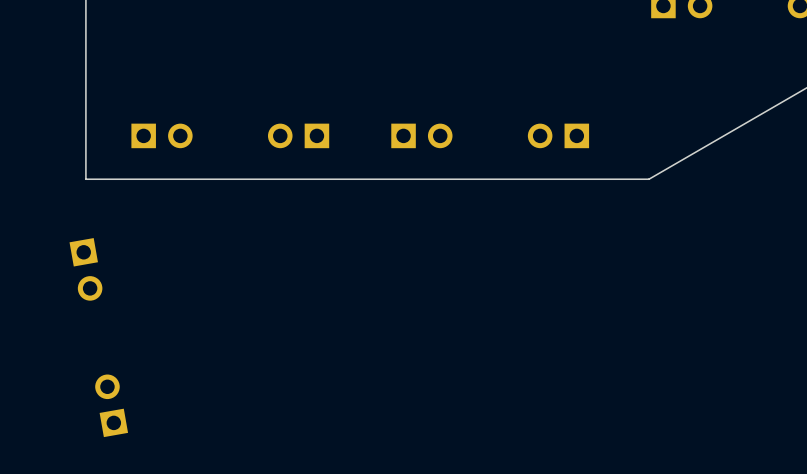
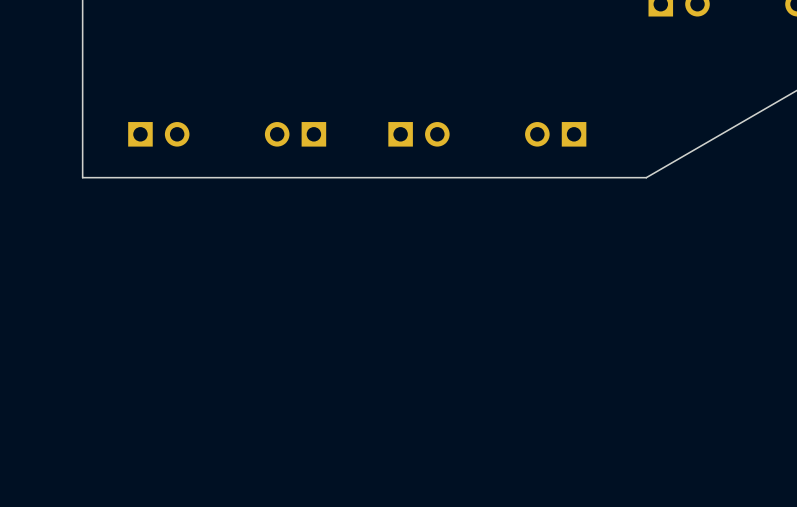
part: (85, 269) -> none
part: (111, 405) -> none

